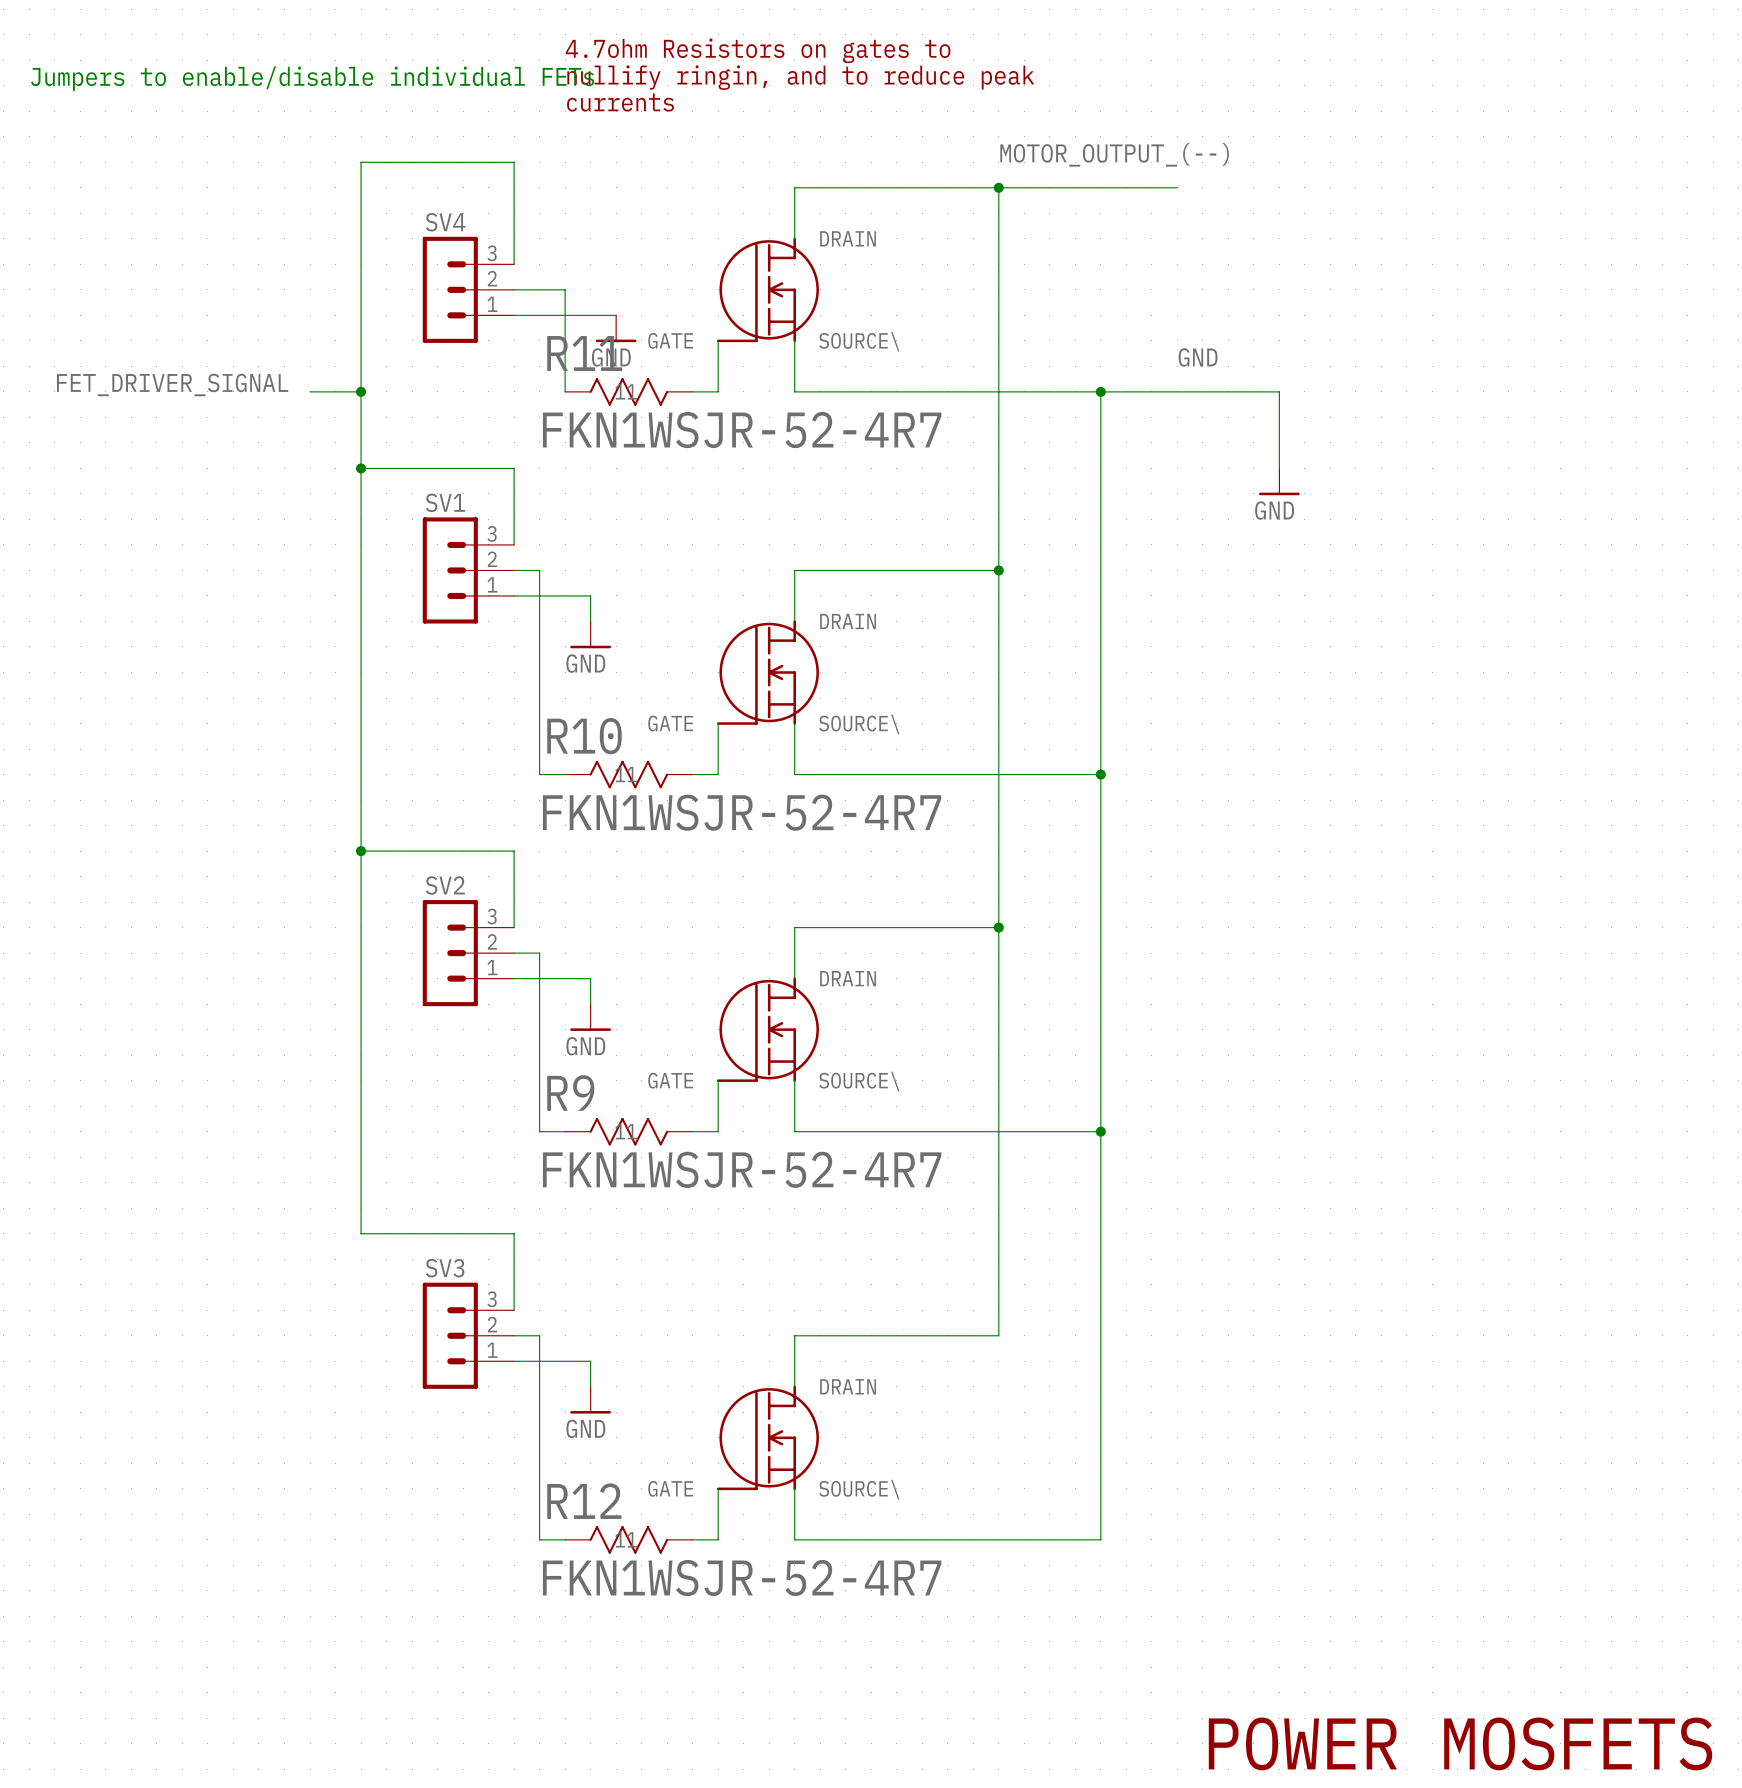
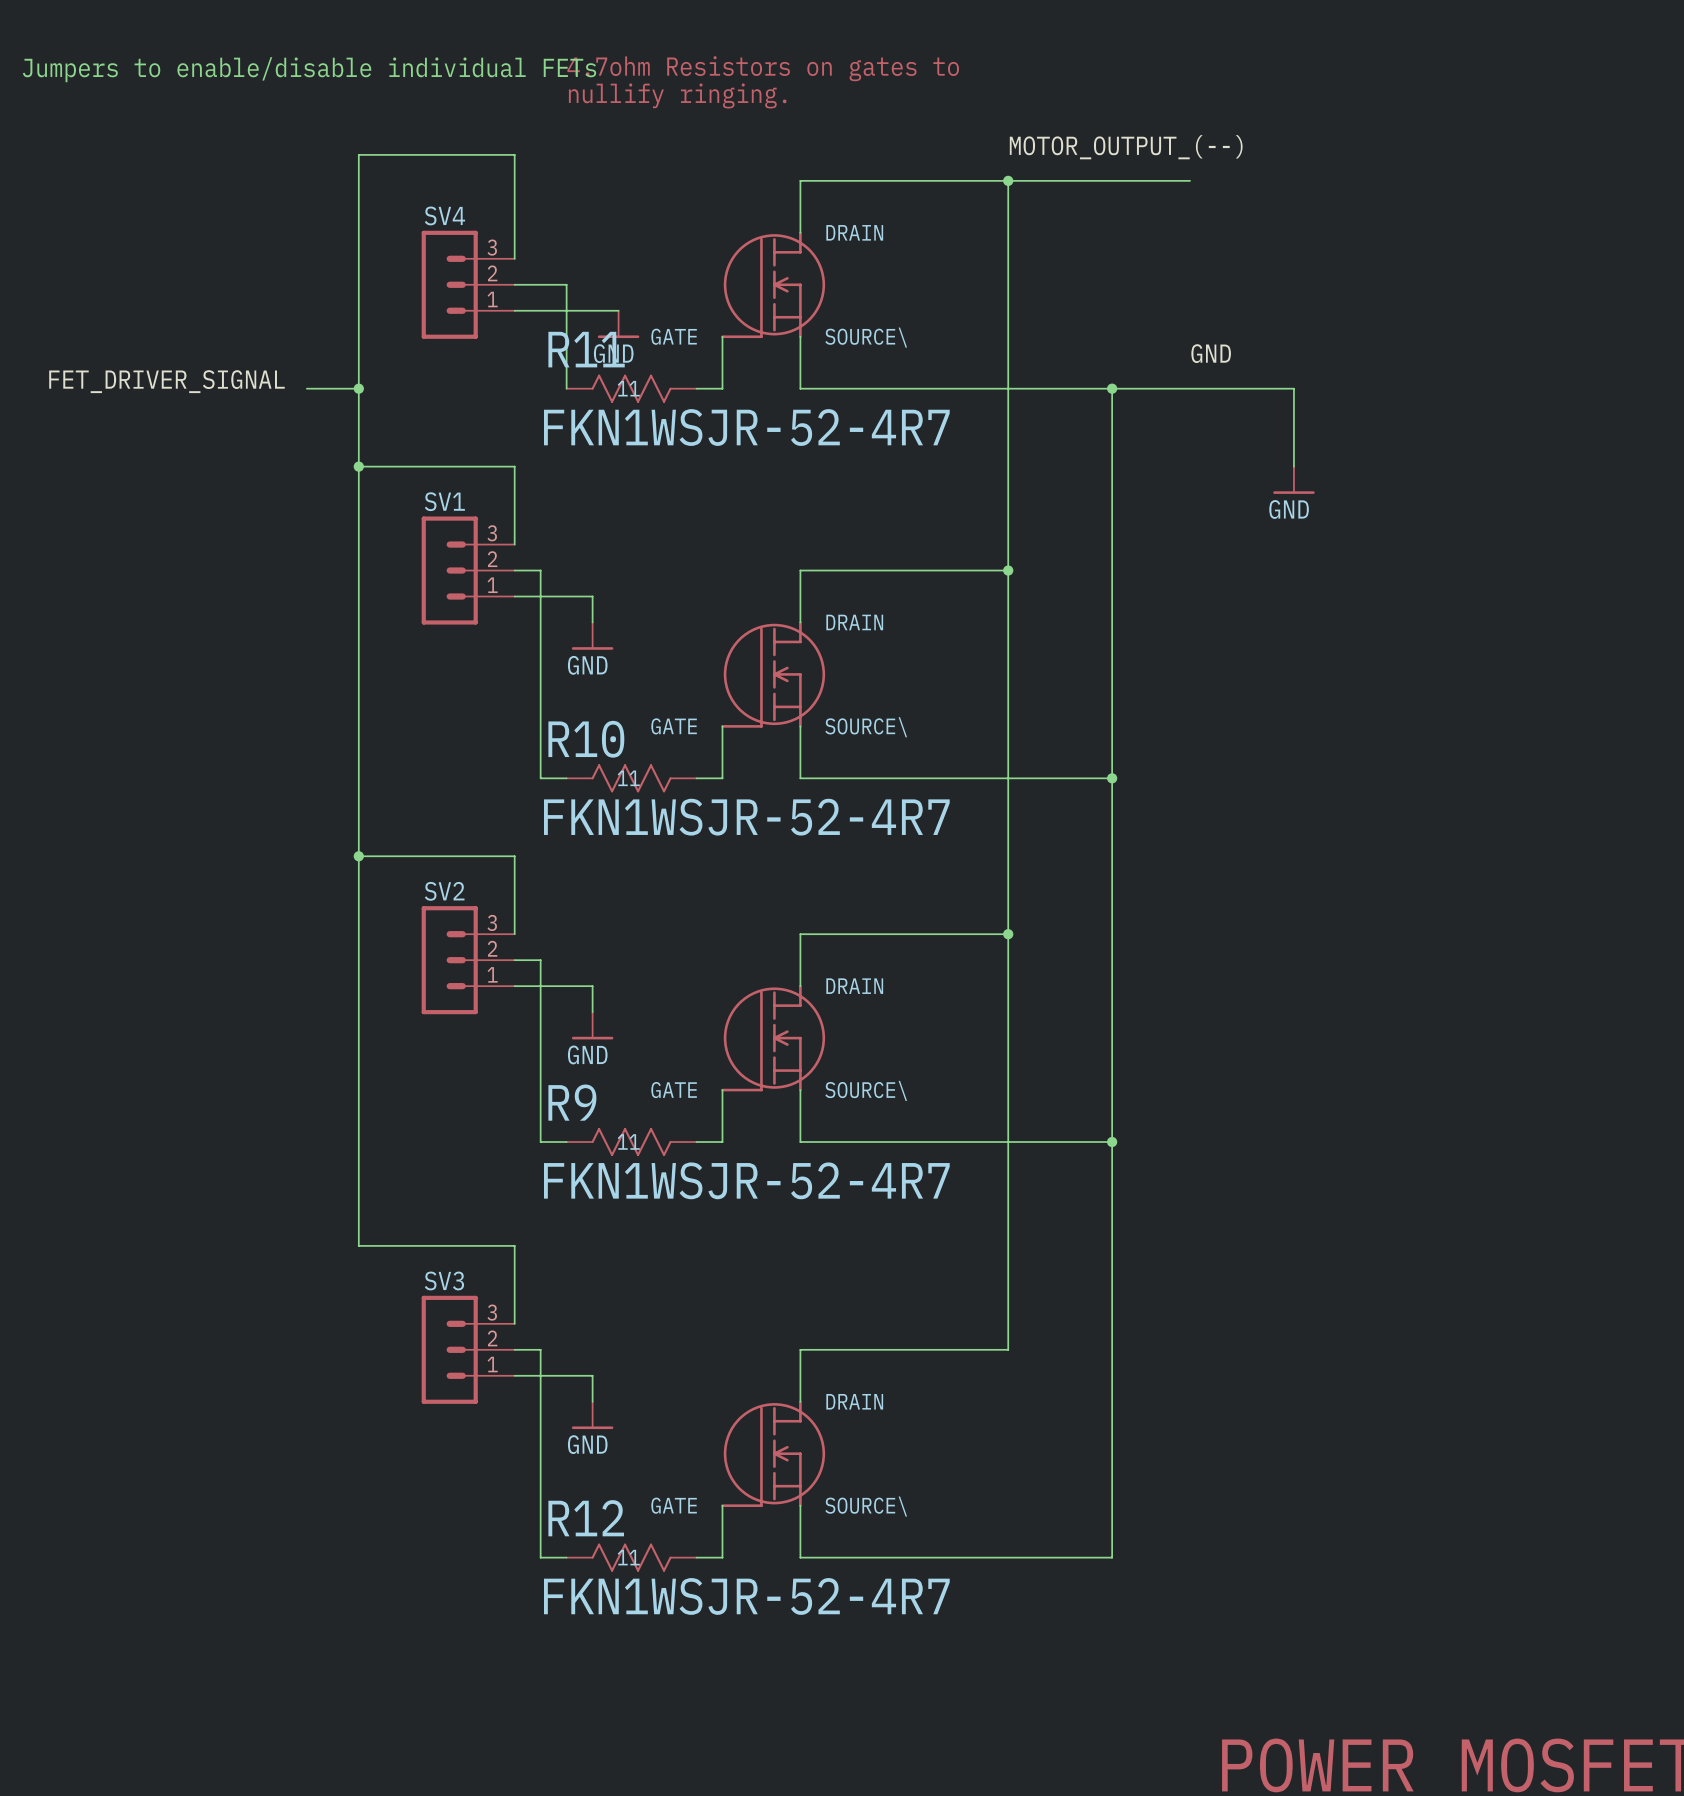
text: 4.7ohm Resistors on gates to (758, 50) -> none
text: nullify ringin, and to reduce peak (800, 77) -> 4.7ohm Resistors on gates to (763, 68)
text: currents (620, 102) -> nullify ringing. (677, 95)

